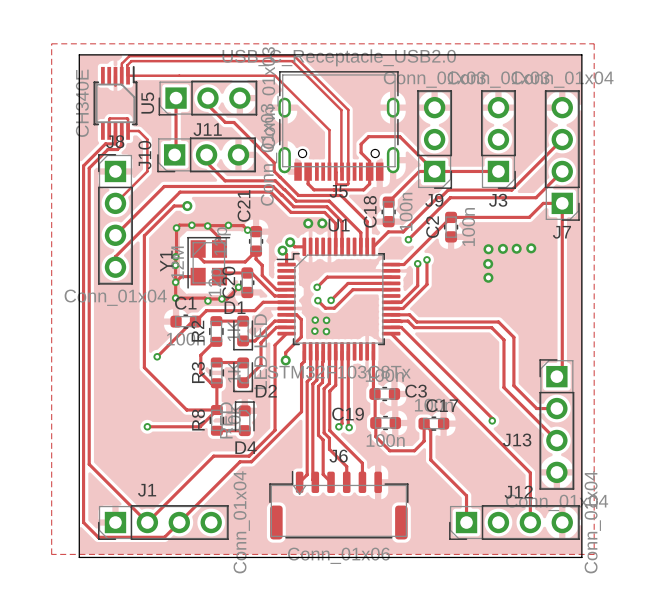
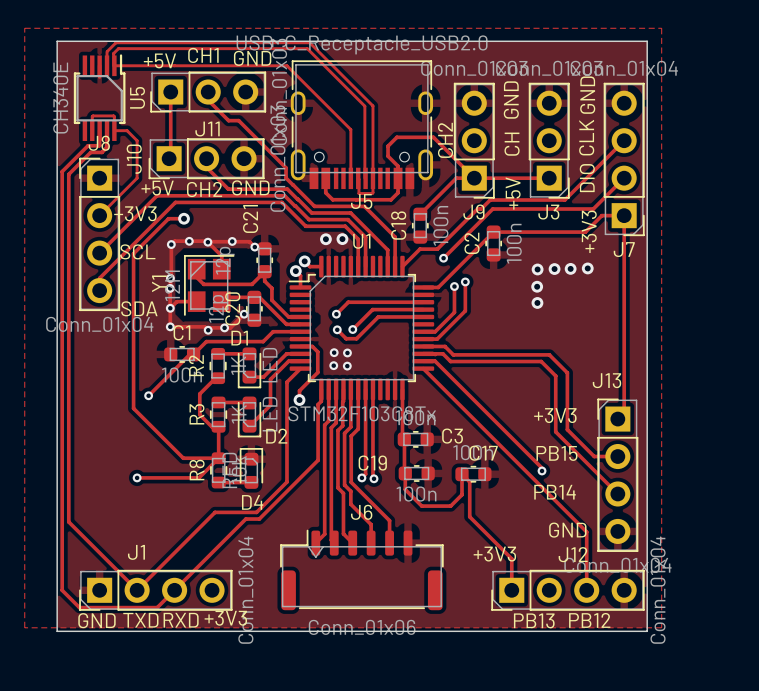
text: none -> CH1 (203, 55)
text: none -> GND (252, 58)
text: none -> +5V (159, 60)
text: none -> GND (587, 95)
text: none -> GND (511, 100)
text: none -> CLK (586, 137)
text: none -> CH2 (445, 140)
text: none -> CH (512, 144)
text: none -> DIO (587, 178)
text: none -> +5V (157, 188)
text: none -> GND (250, 187)
text: none -> CH2 (204, 189)
text: none -> +5V (513, 193)
text: none -> +3V3 (135, 213)
text: none -> +3V3 (589, 231)
text: none -> SCL (137, 251)
text: none -> SDA (139, 308)
text: none -> +3V3 (555, 415)
text: none -> PB15 (556, 453)
text: none -> PB14 (555, 492)
J13 name position: J13 (517, 440) -> J13 (606, 380)
text: none -> GND (567, 530)
text: none -> +3V3 (494, 554)
text: none -> +3V3 (225, 618)
text: none -> GND (96, 620)
text: none -> TXD (140, 620)
text: none -> RXD (181, 620)
text: none -> PB13 (534, 620)
text: none -> PB12 (589, 620)

